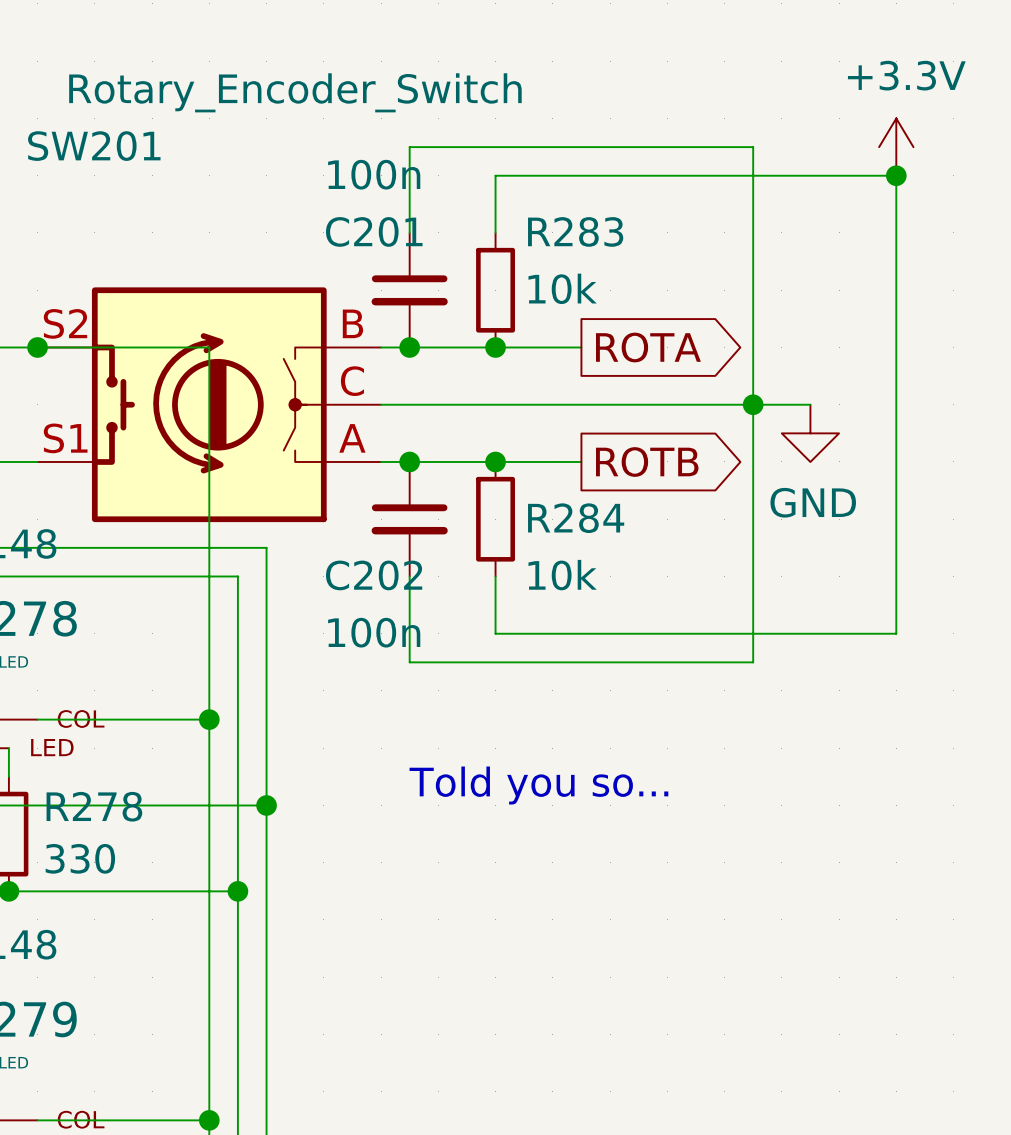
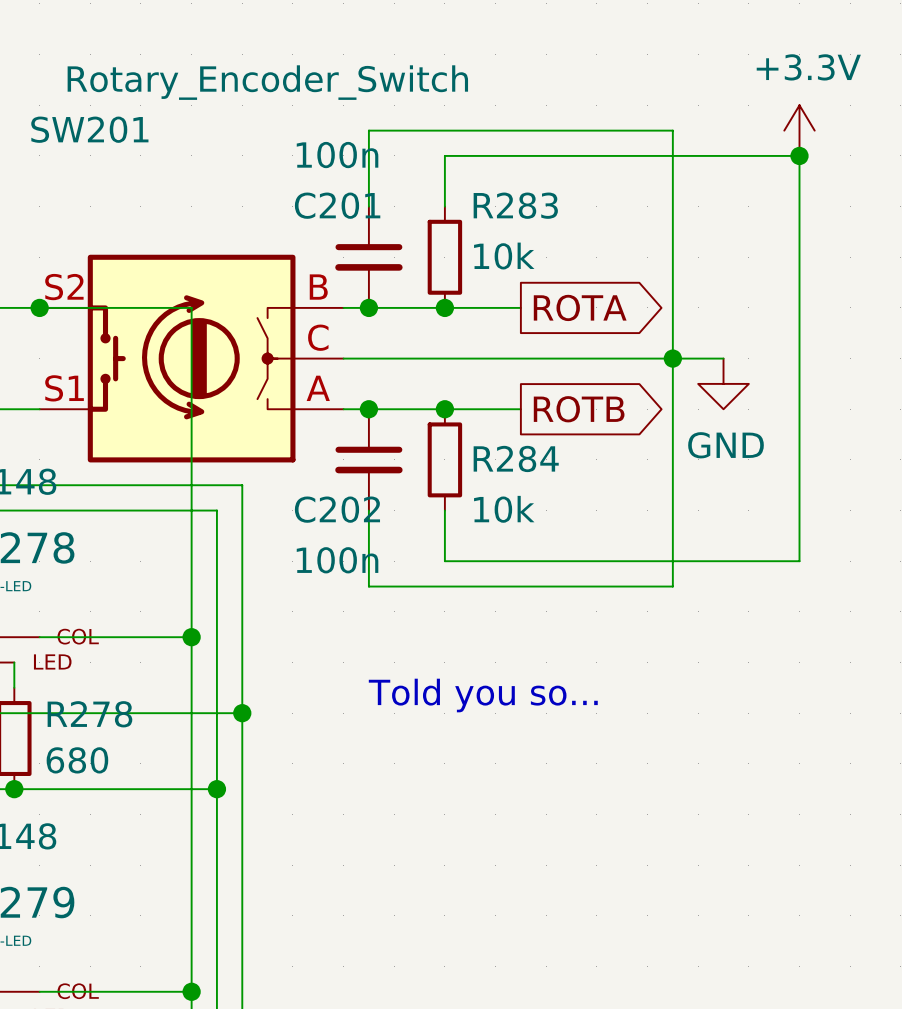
R278 value: 330 (80, 858) -> 680 (77, 760)

